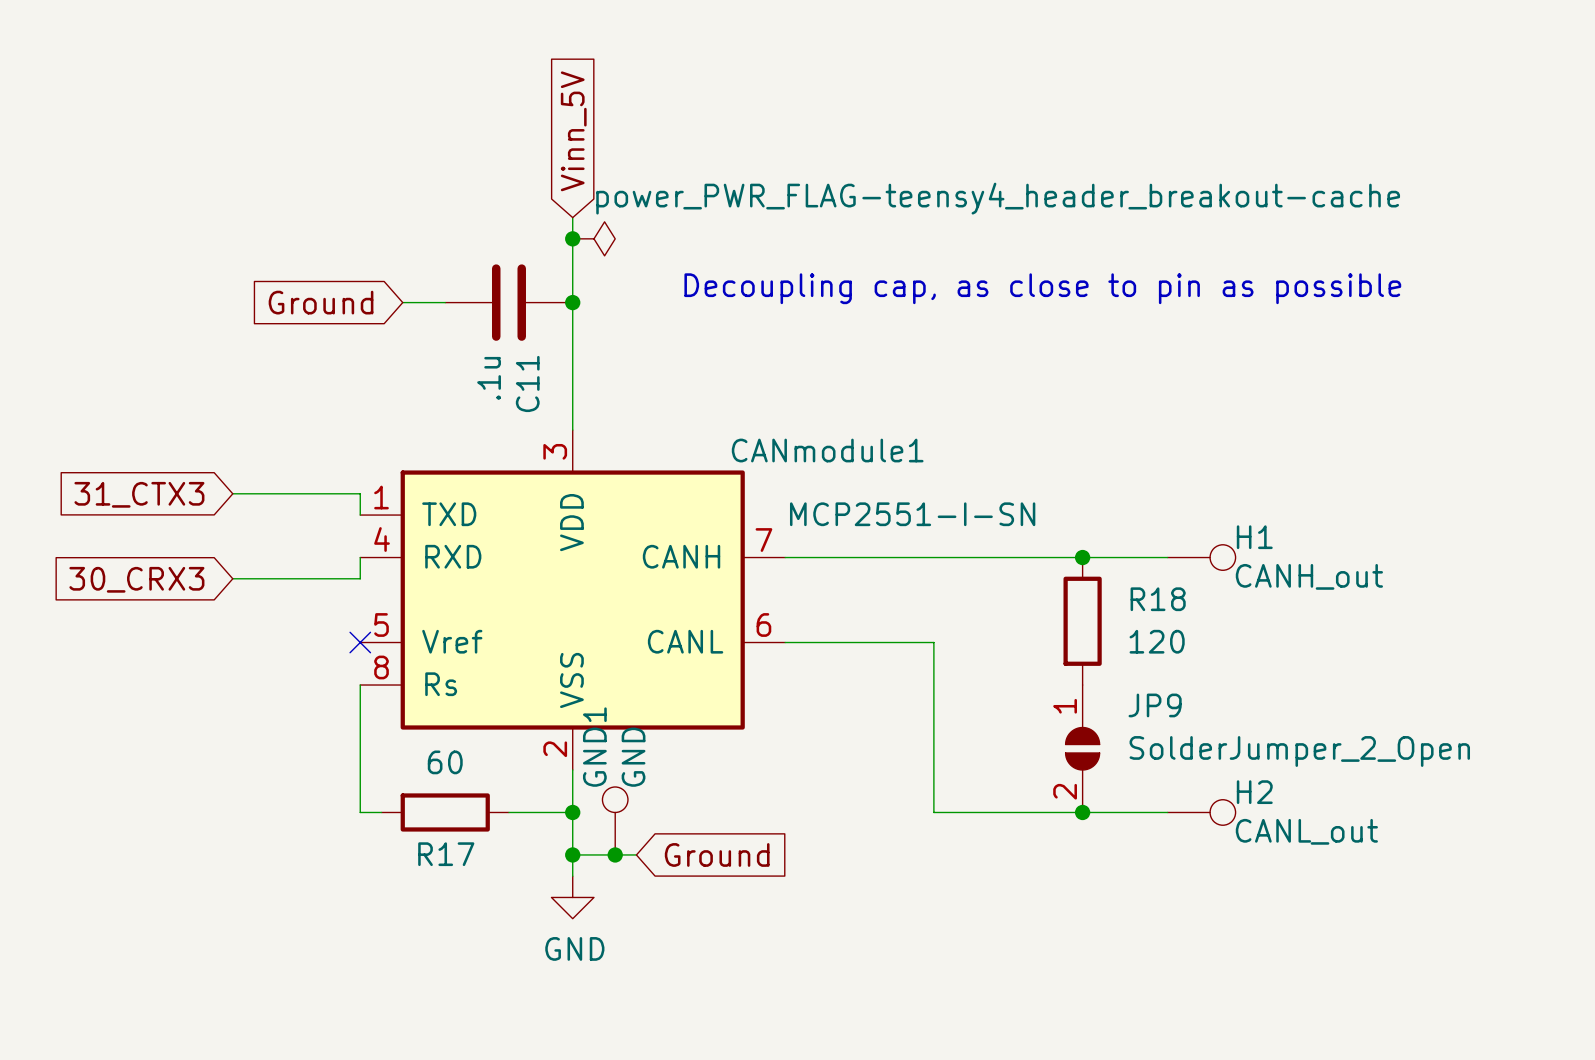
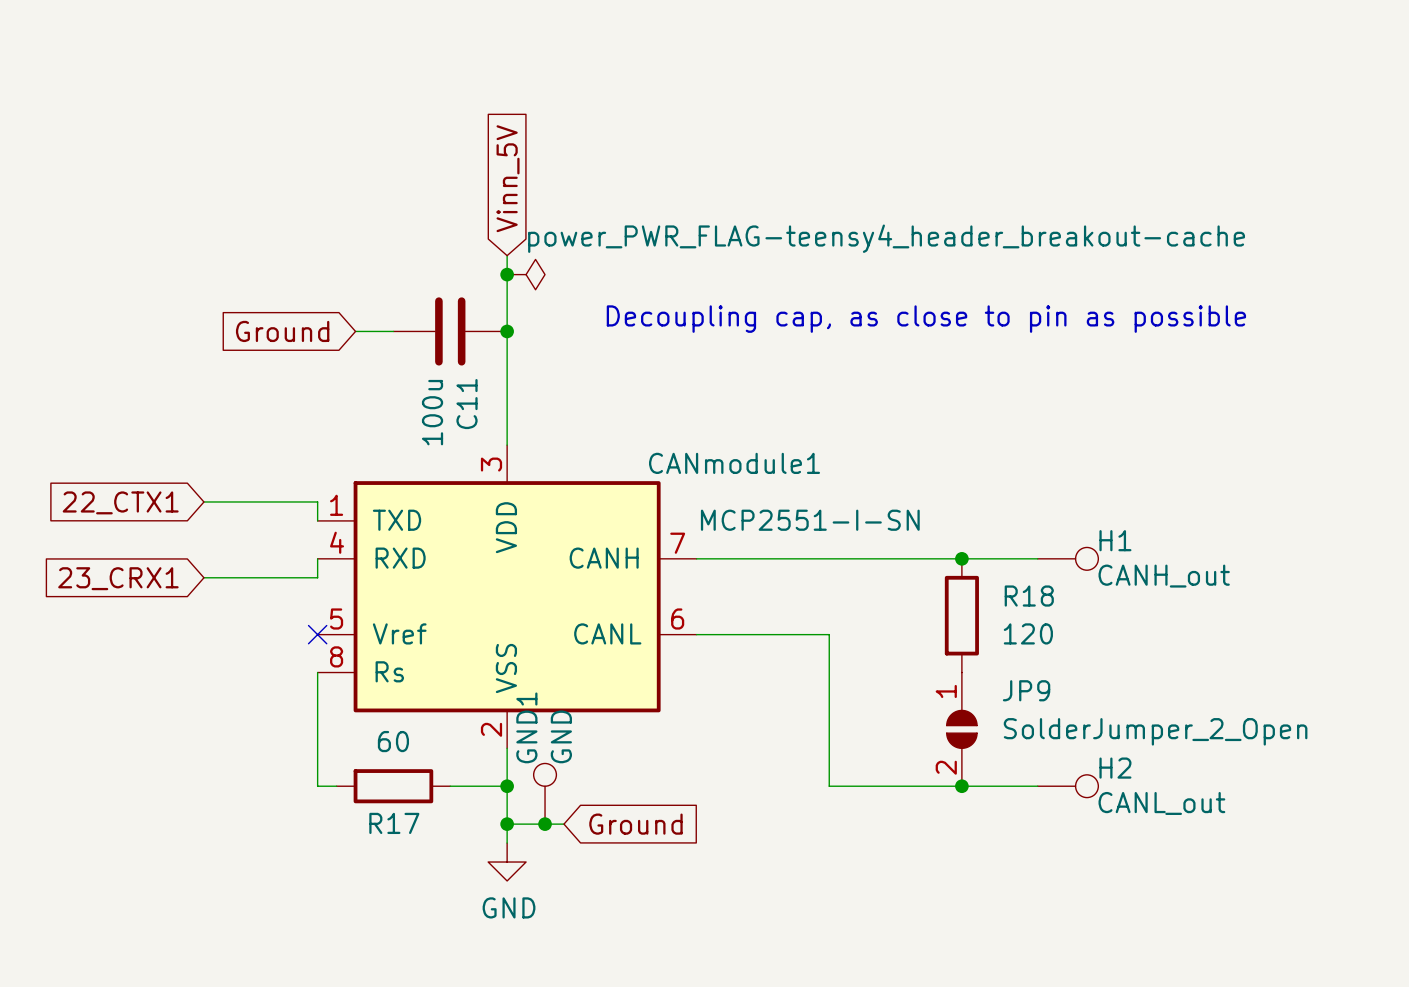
C11 value: .1u (489, 378) -> 100u (432, 412)
global label: 31_CTX3 (139, 494) -> 22_CTX1 (120, 502)
global label: 30_CRX3 (136, 579) -> 23_CRX1 (118, 578)

